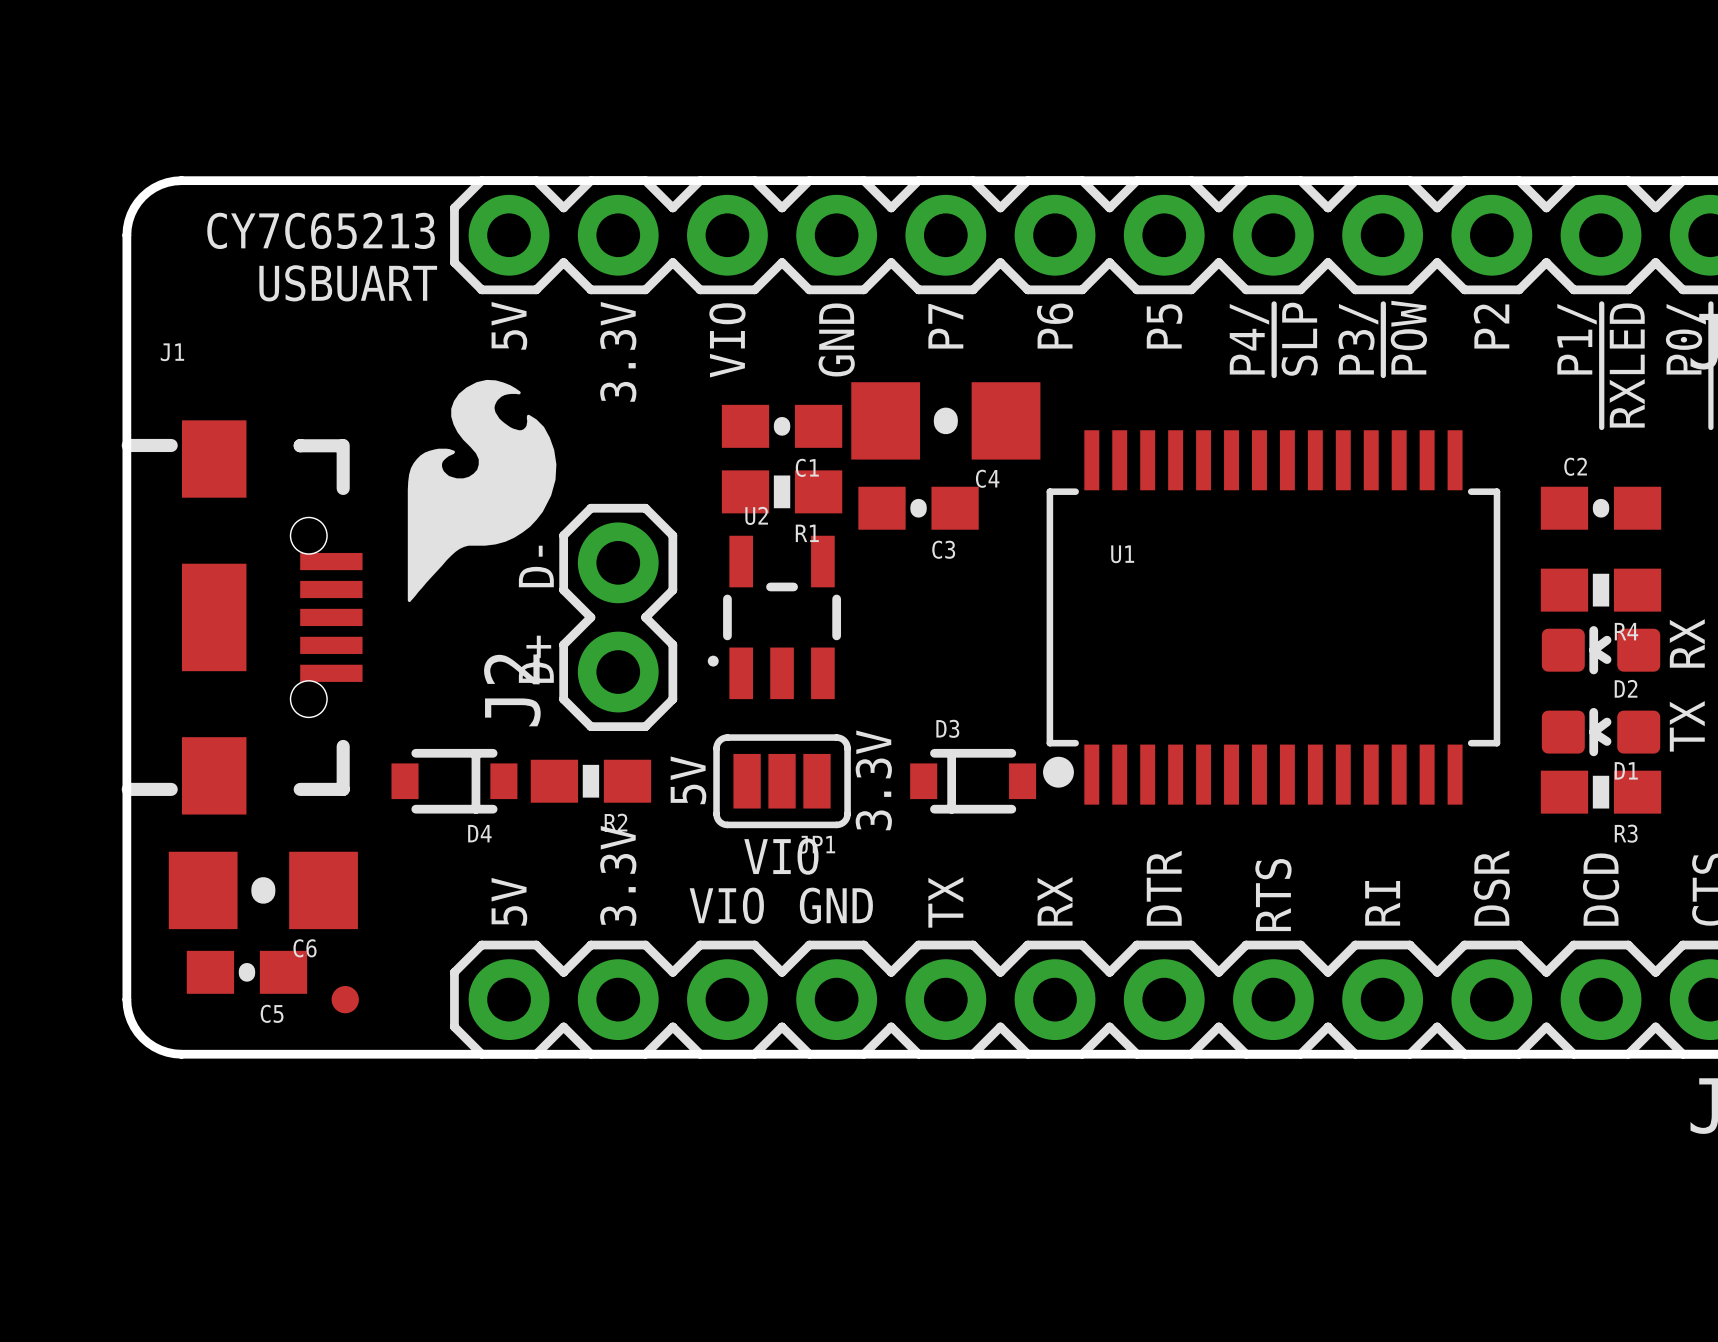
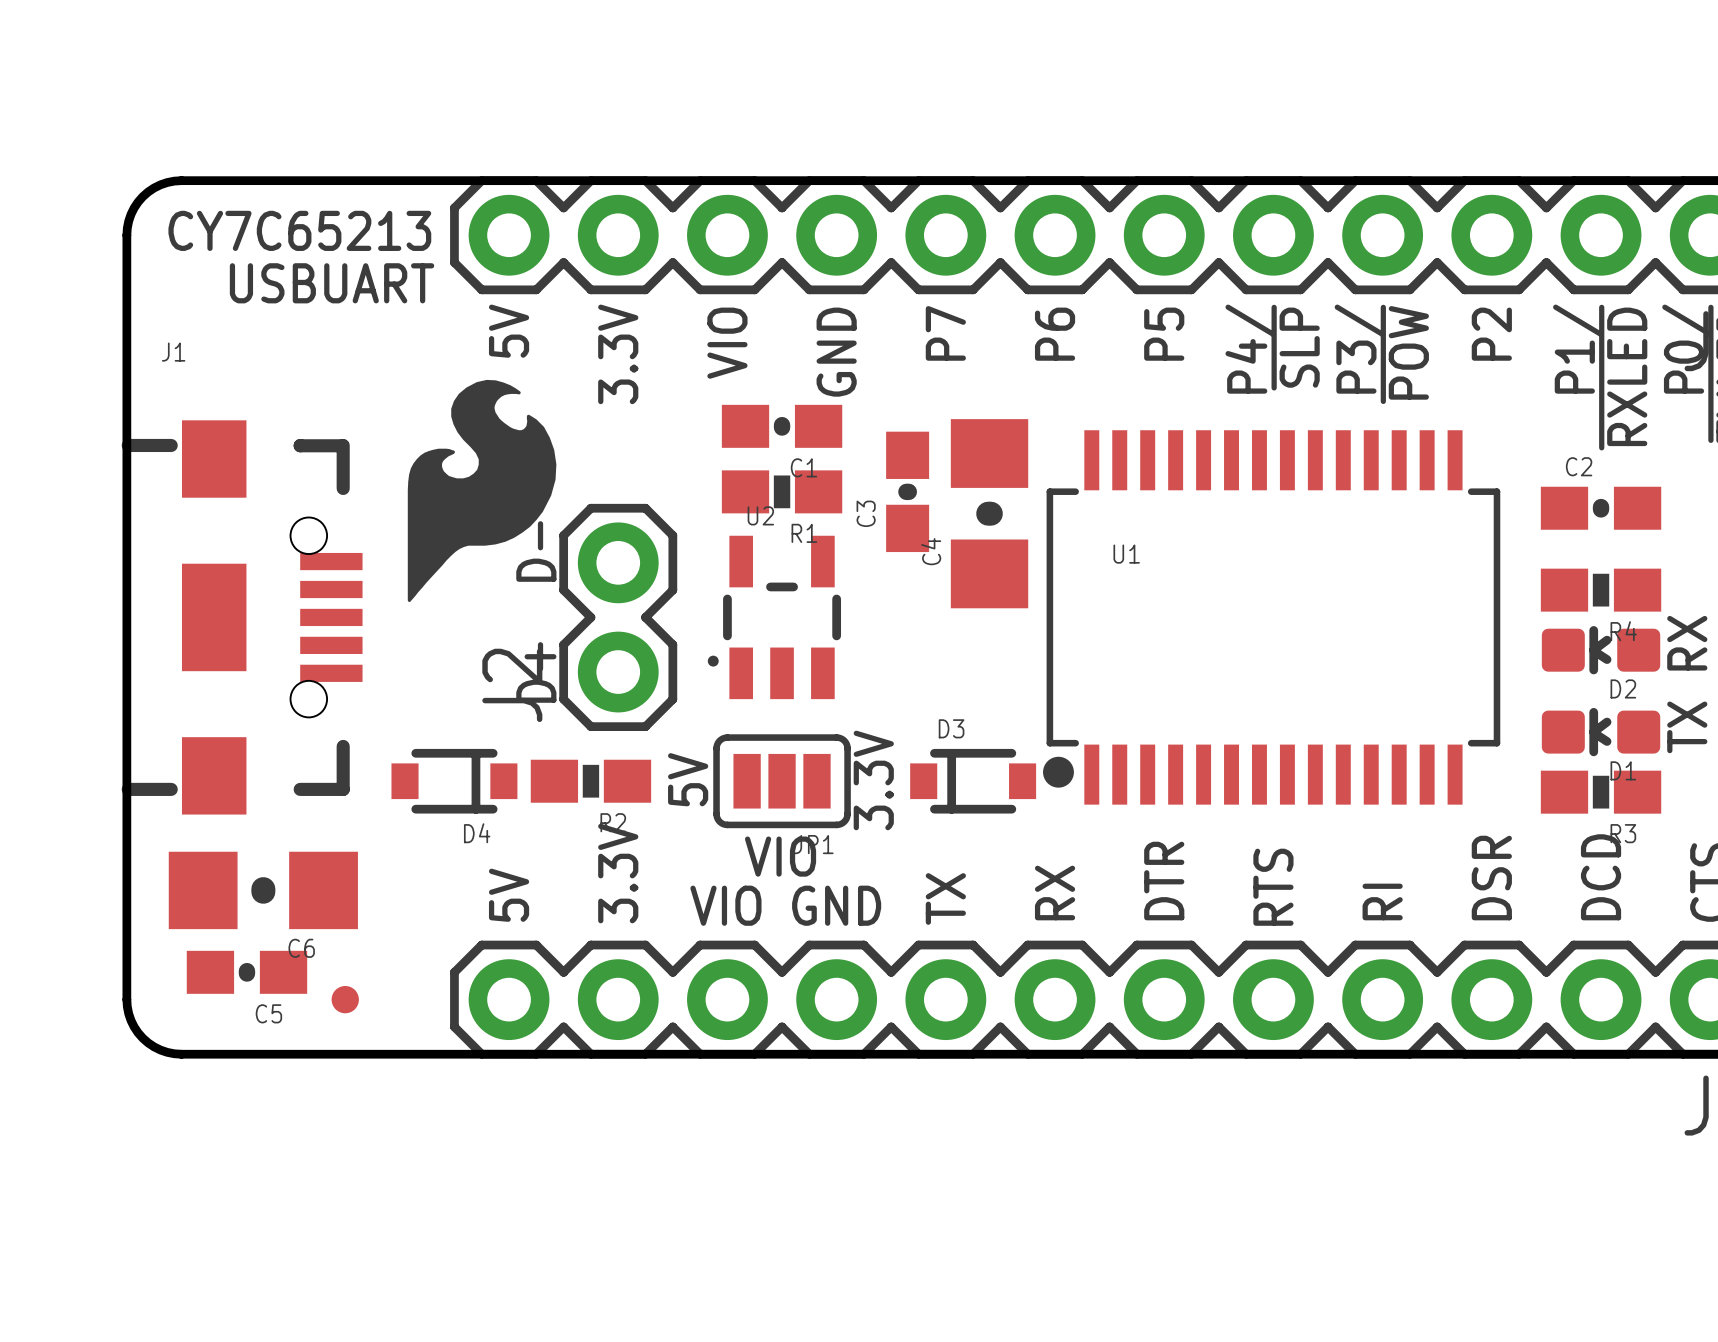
C4 rotation: 0° (945, 420) -> 90° clockwise (989, 513)
C3 rotation: 0° (918, 508) -> 90° clockwise (907, 491)

